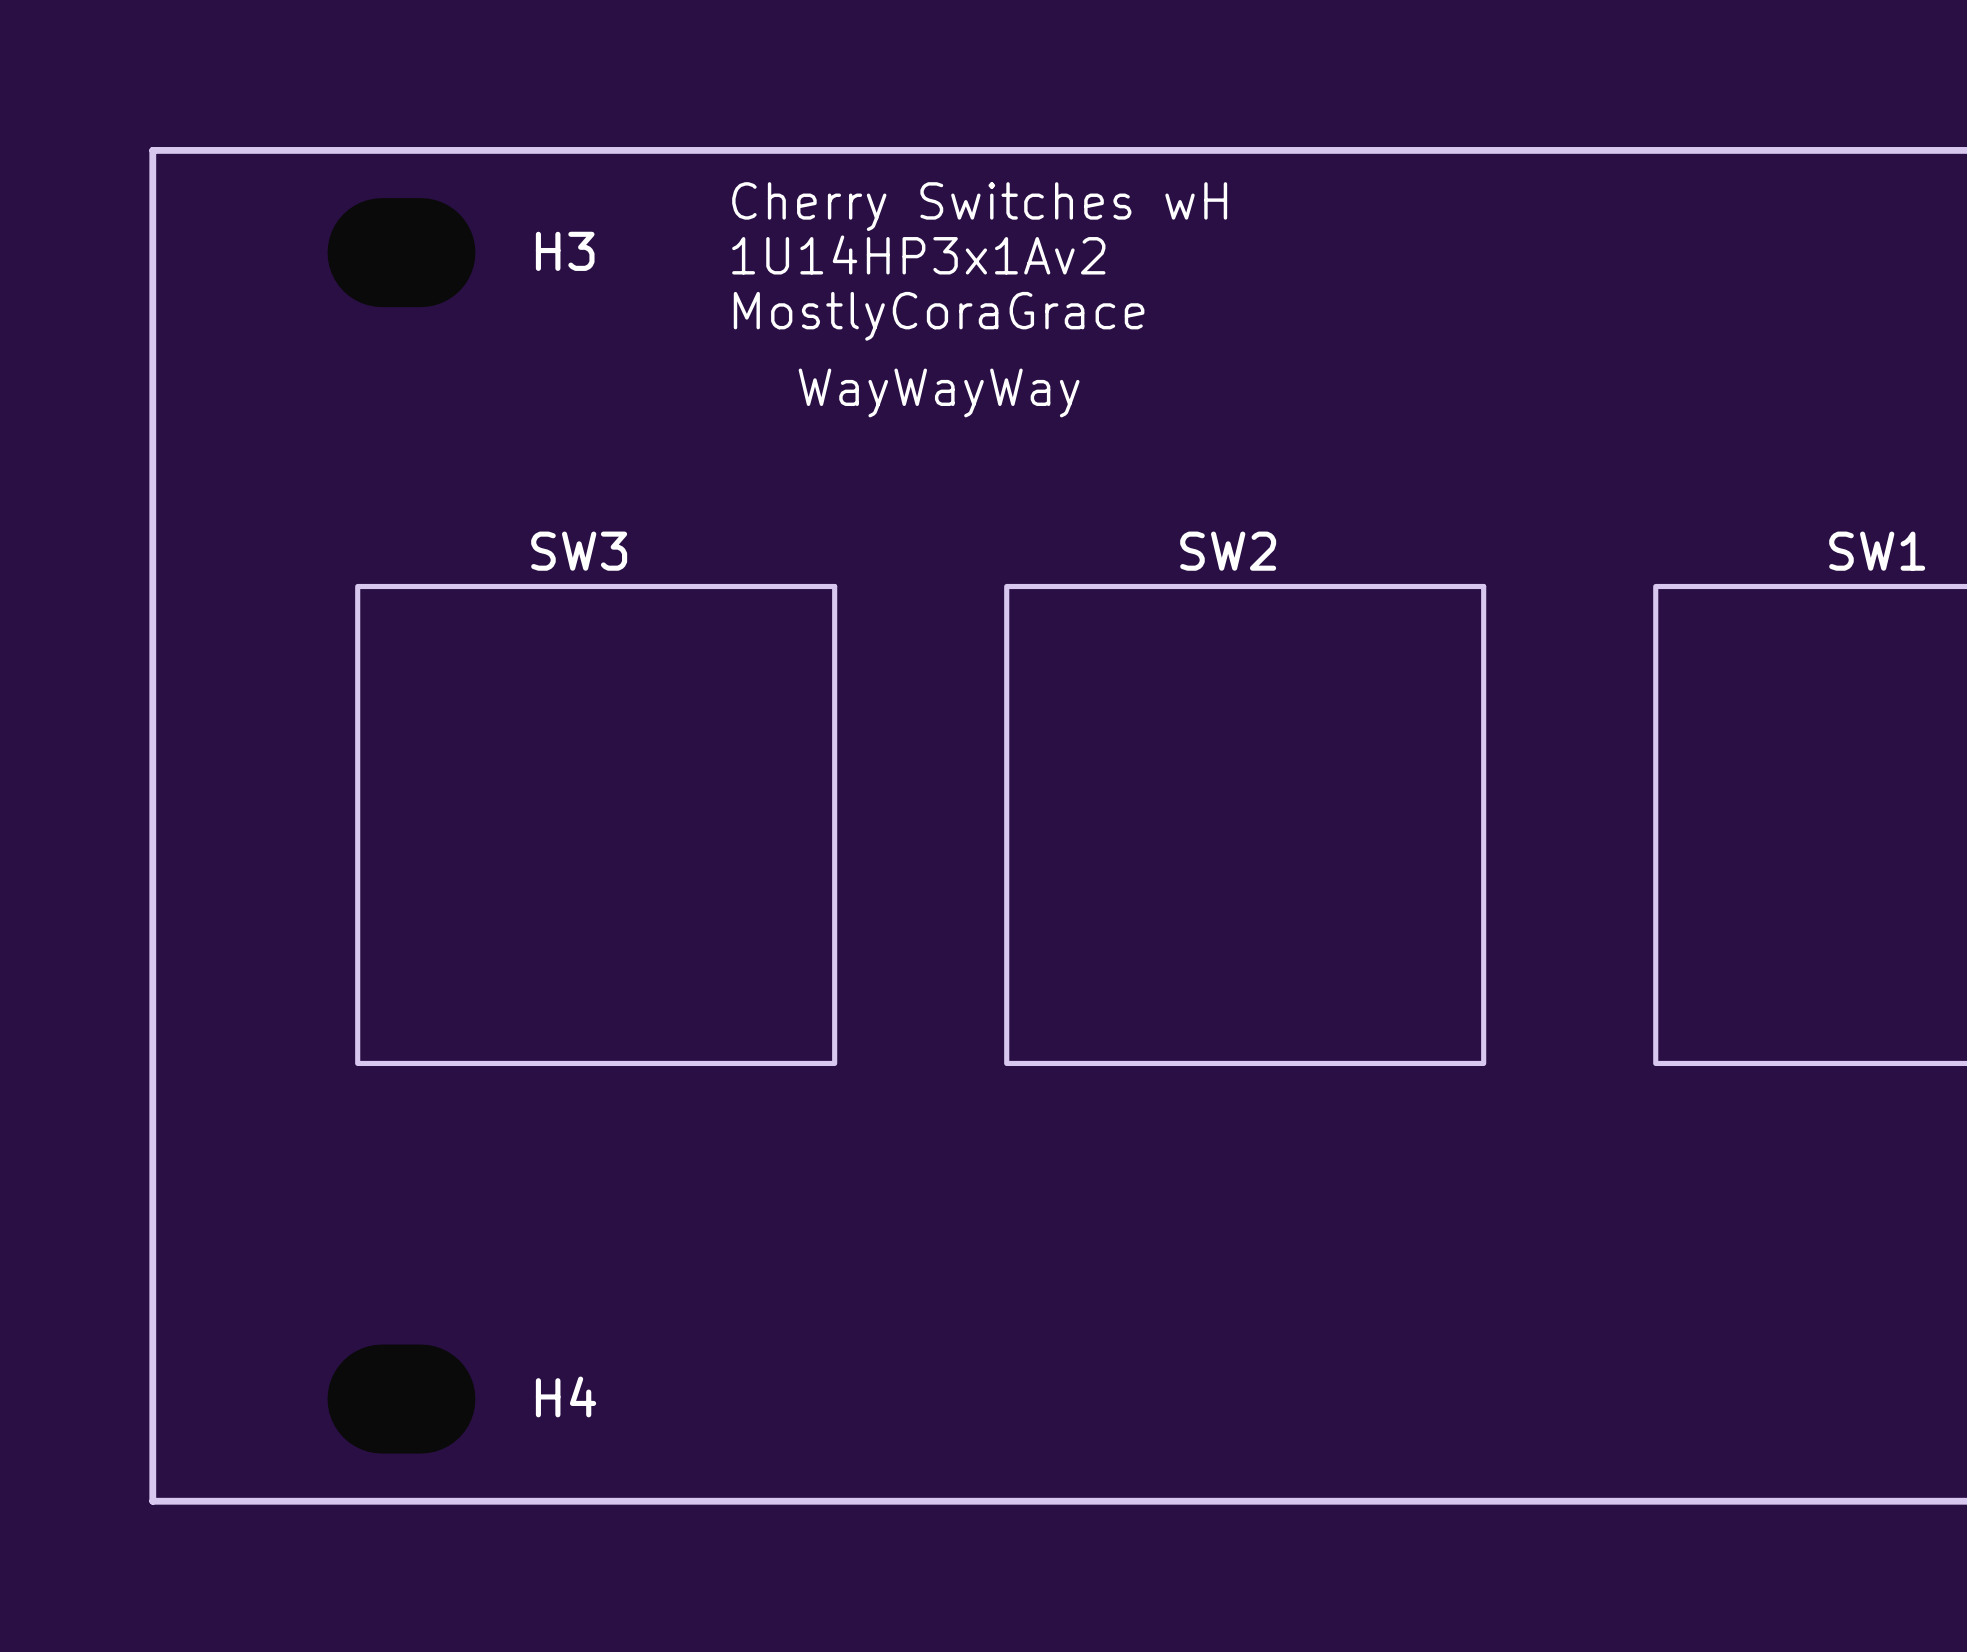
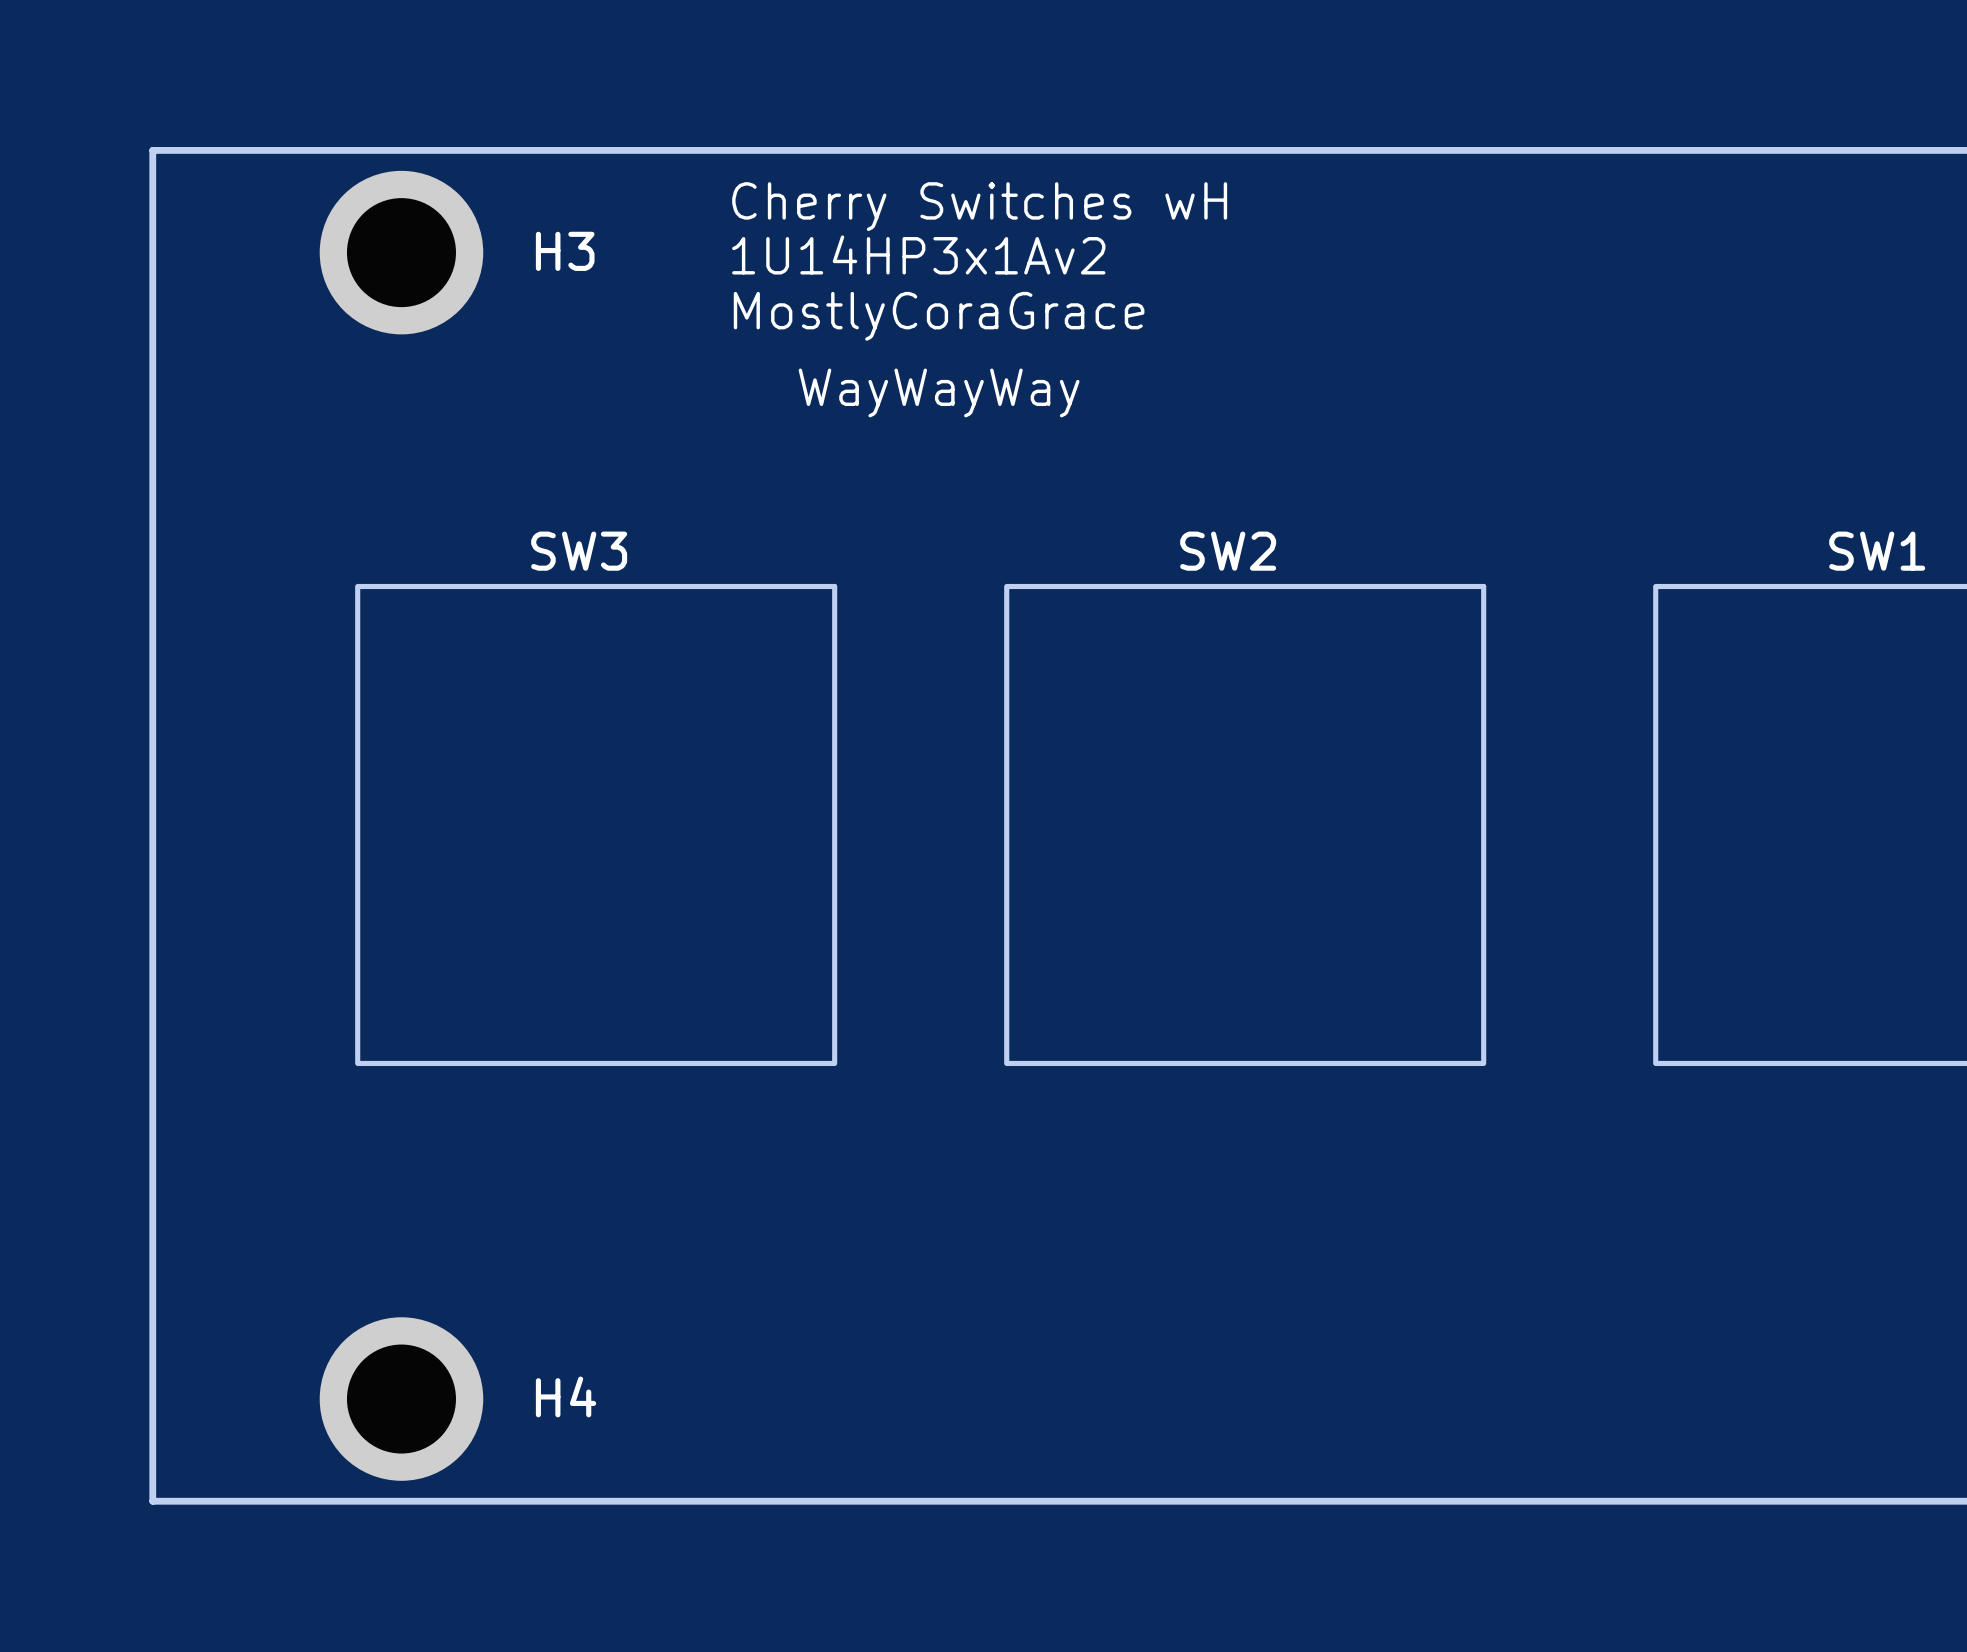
H3 footprint: [327, 198, 476, 308] -> [319, 170, 484, 335]
H4 footprint: [327, 1344, 476, 1454] -> [319, 1317, 484, 1481]

